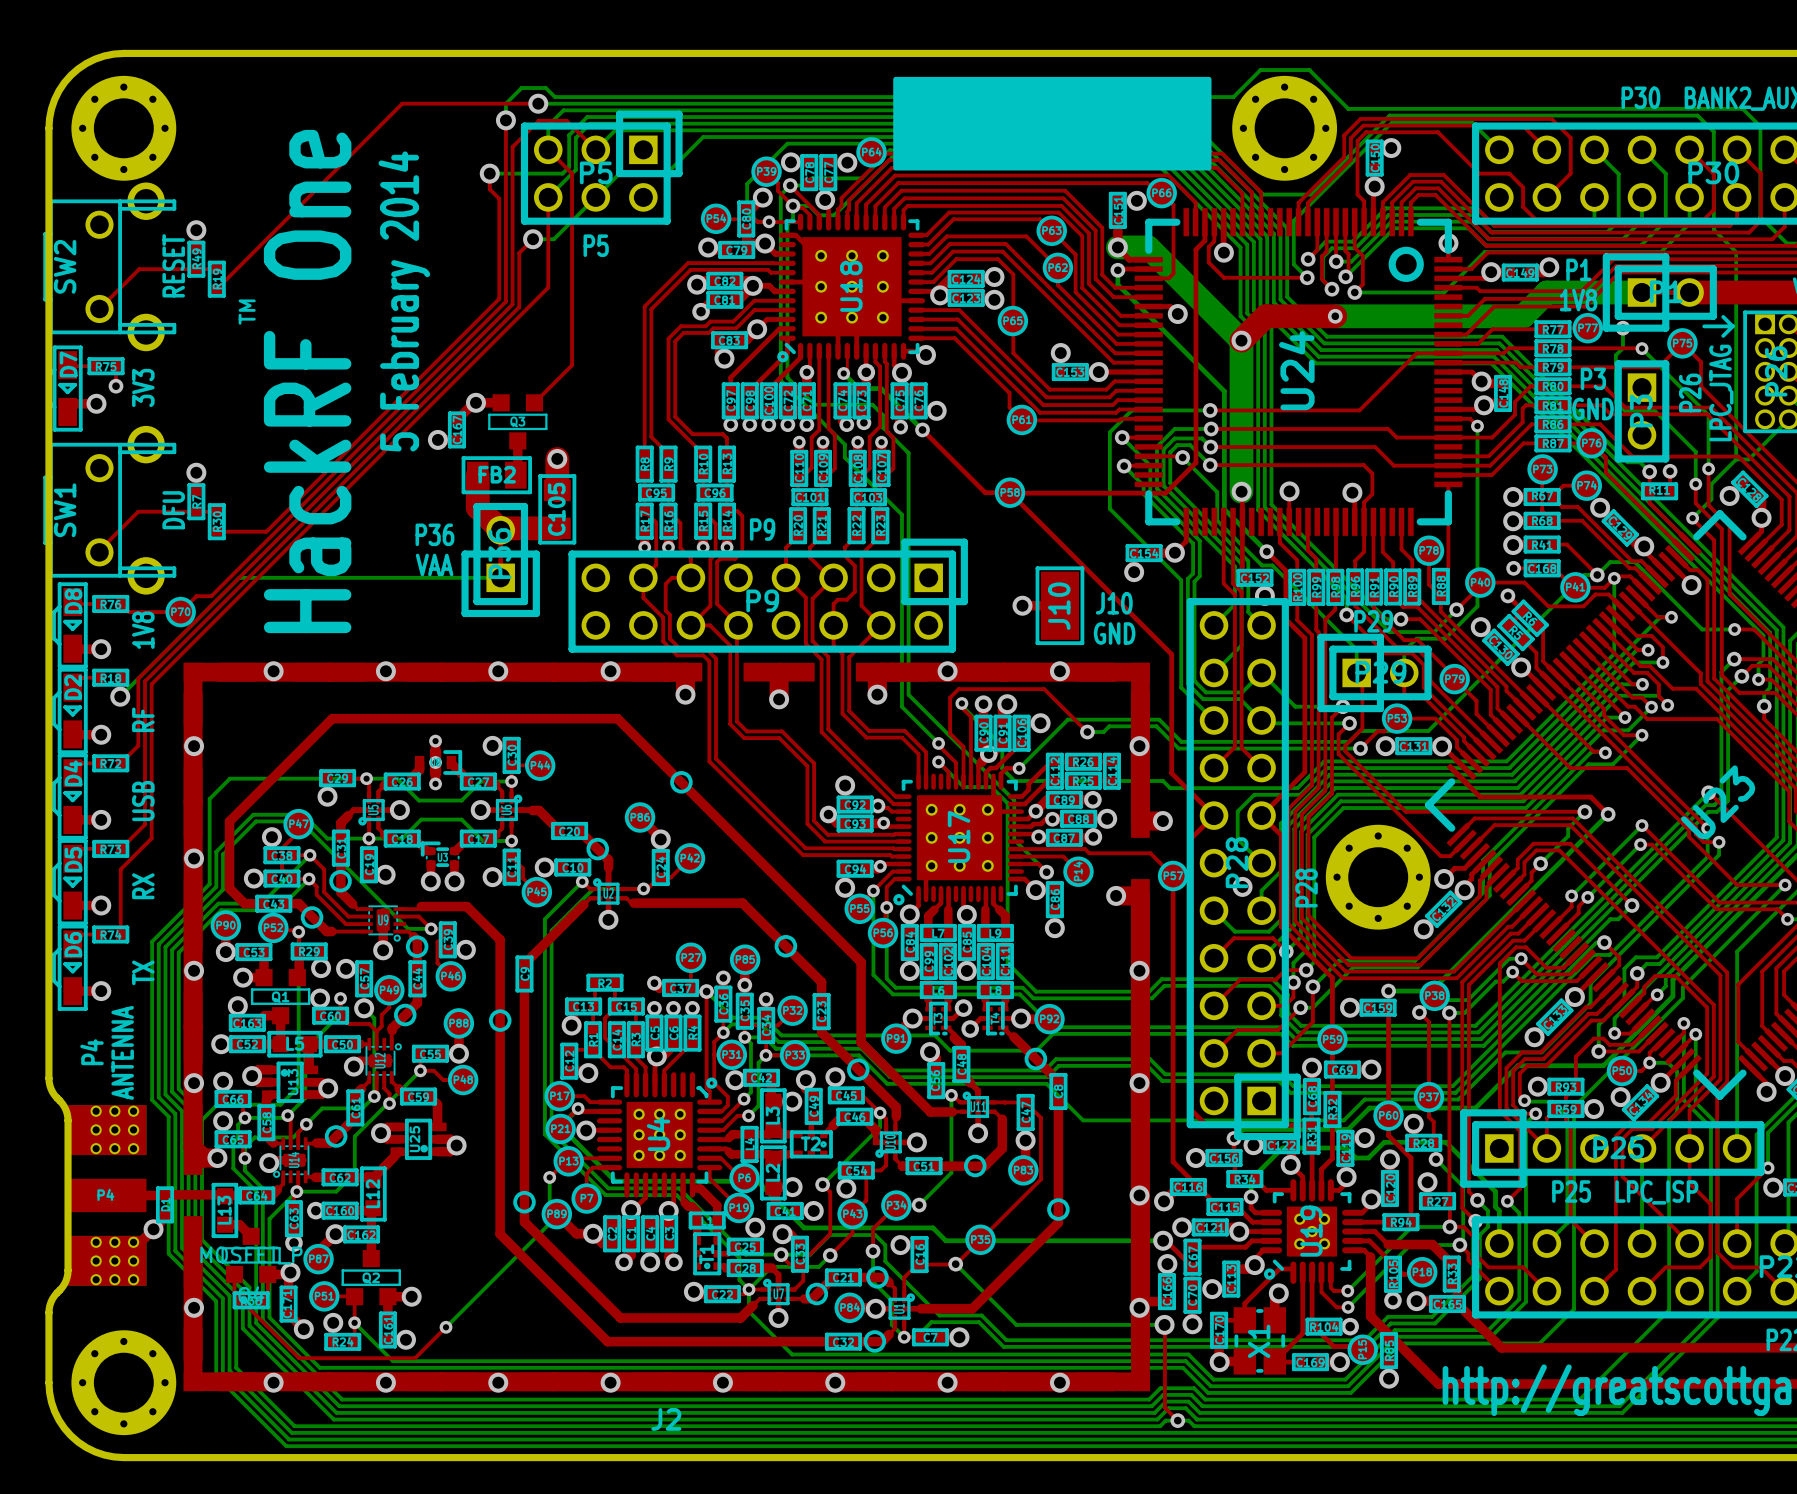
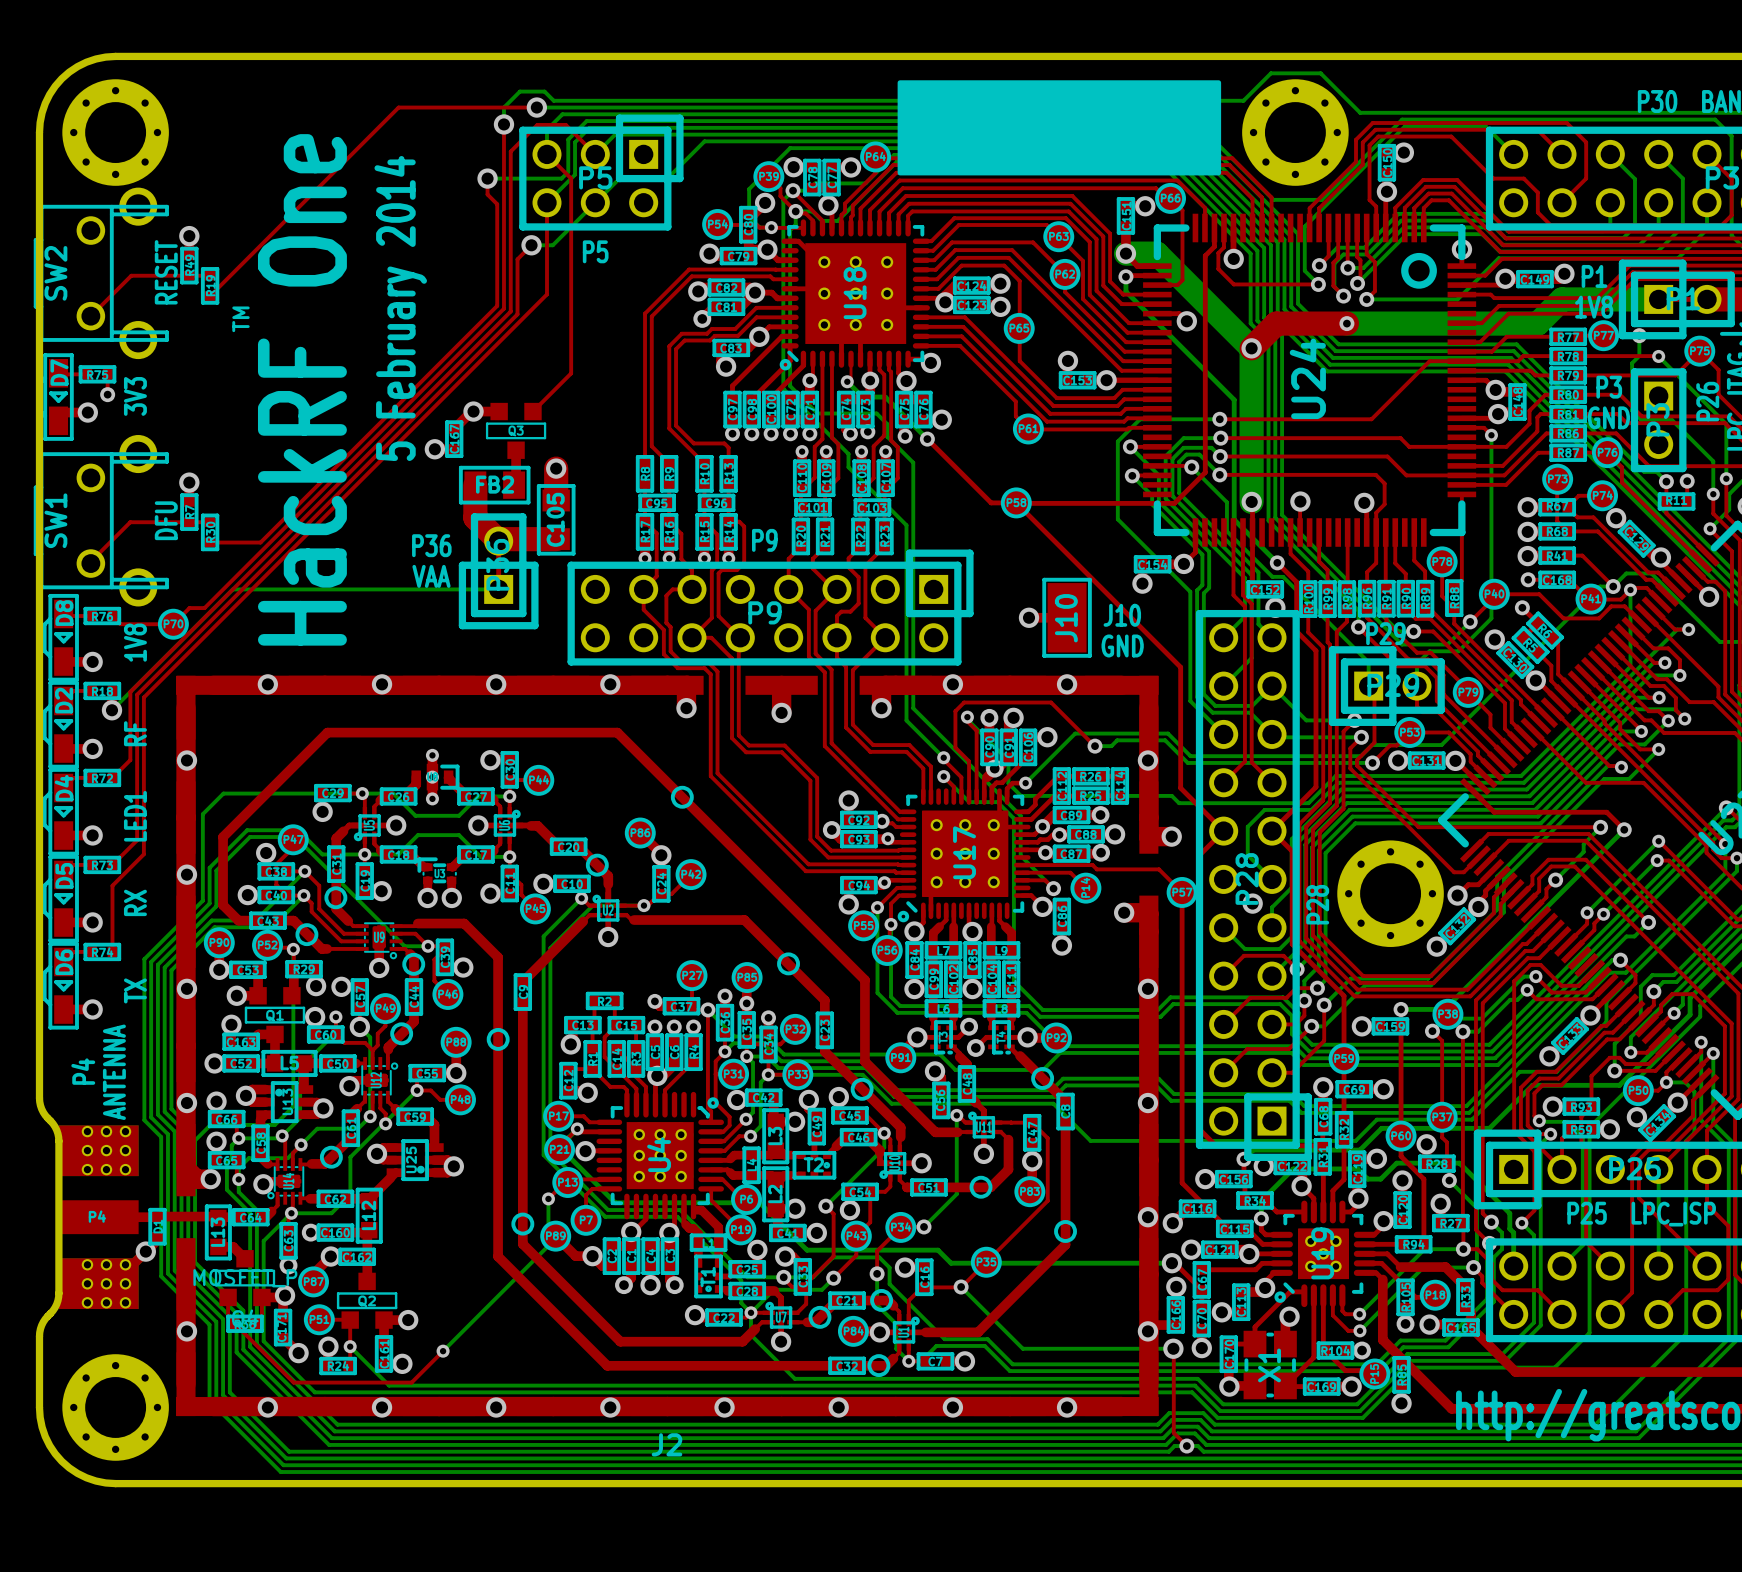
text: USB (143, 801) -> LED1 (135, 816)

